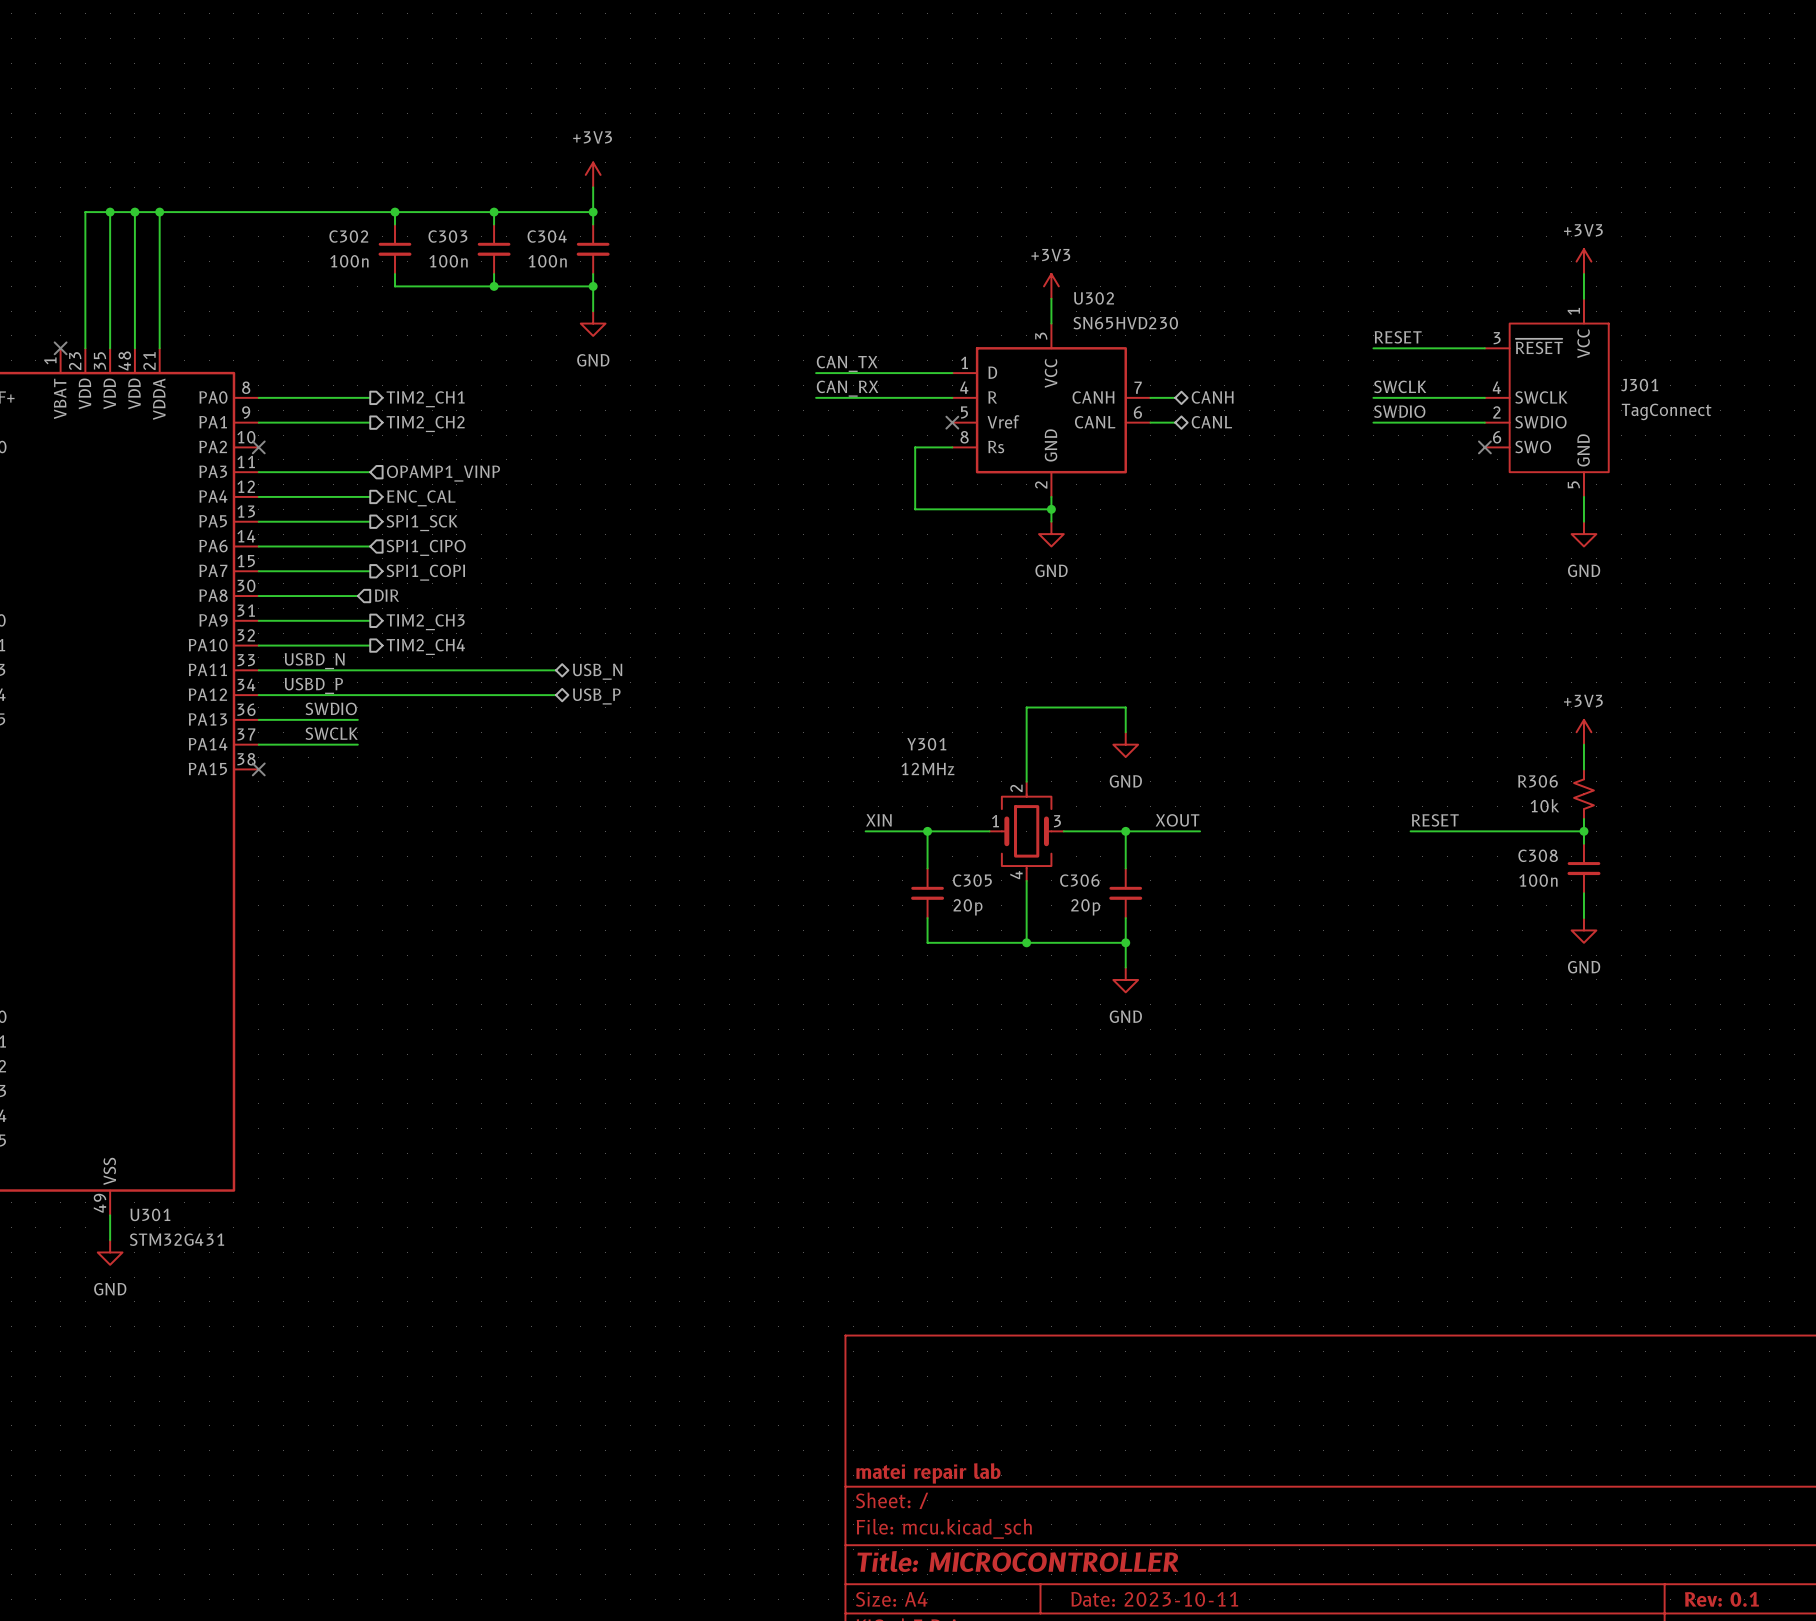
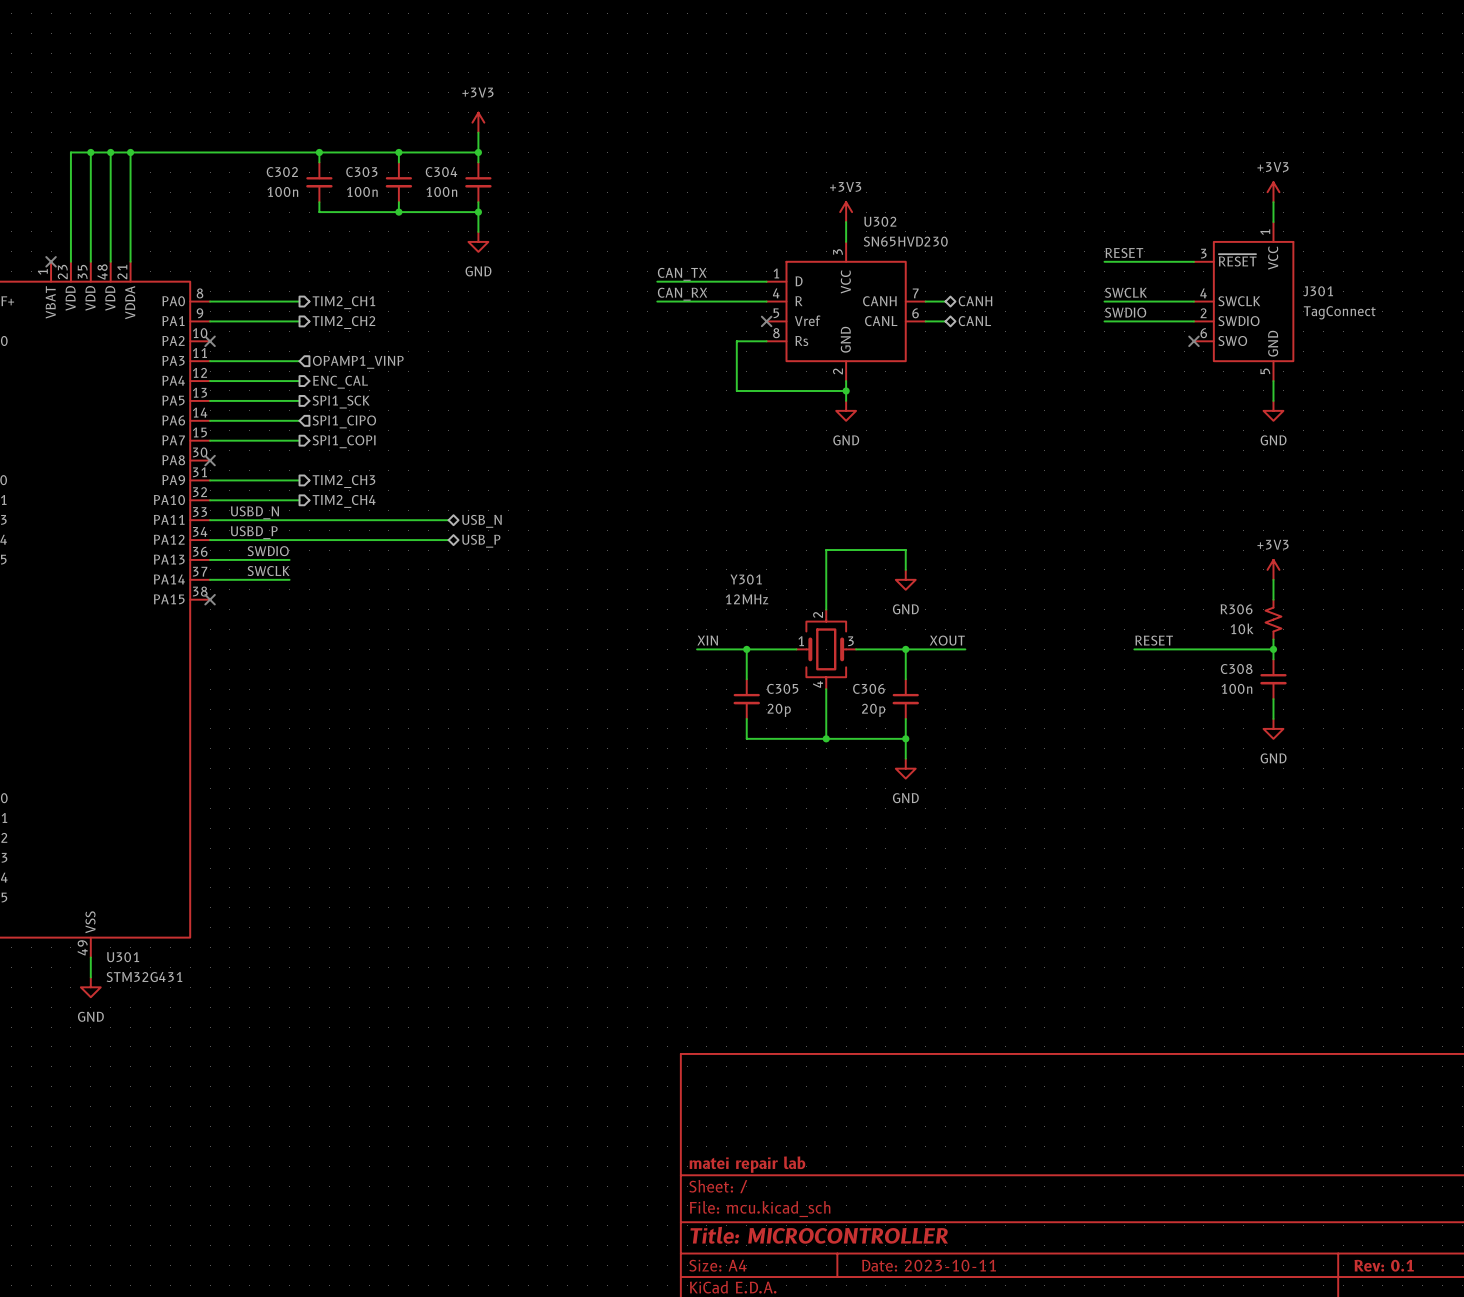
hierarchical label: DIR (387, 595) -> none
wire: (258, 596) (357, 596) -> none
no-connect mark: none -> (210, 460)

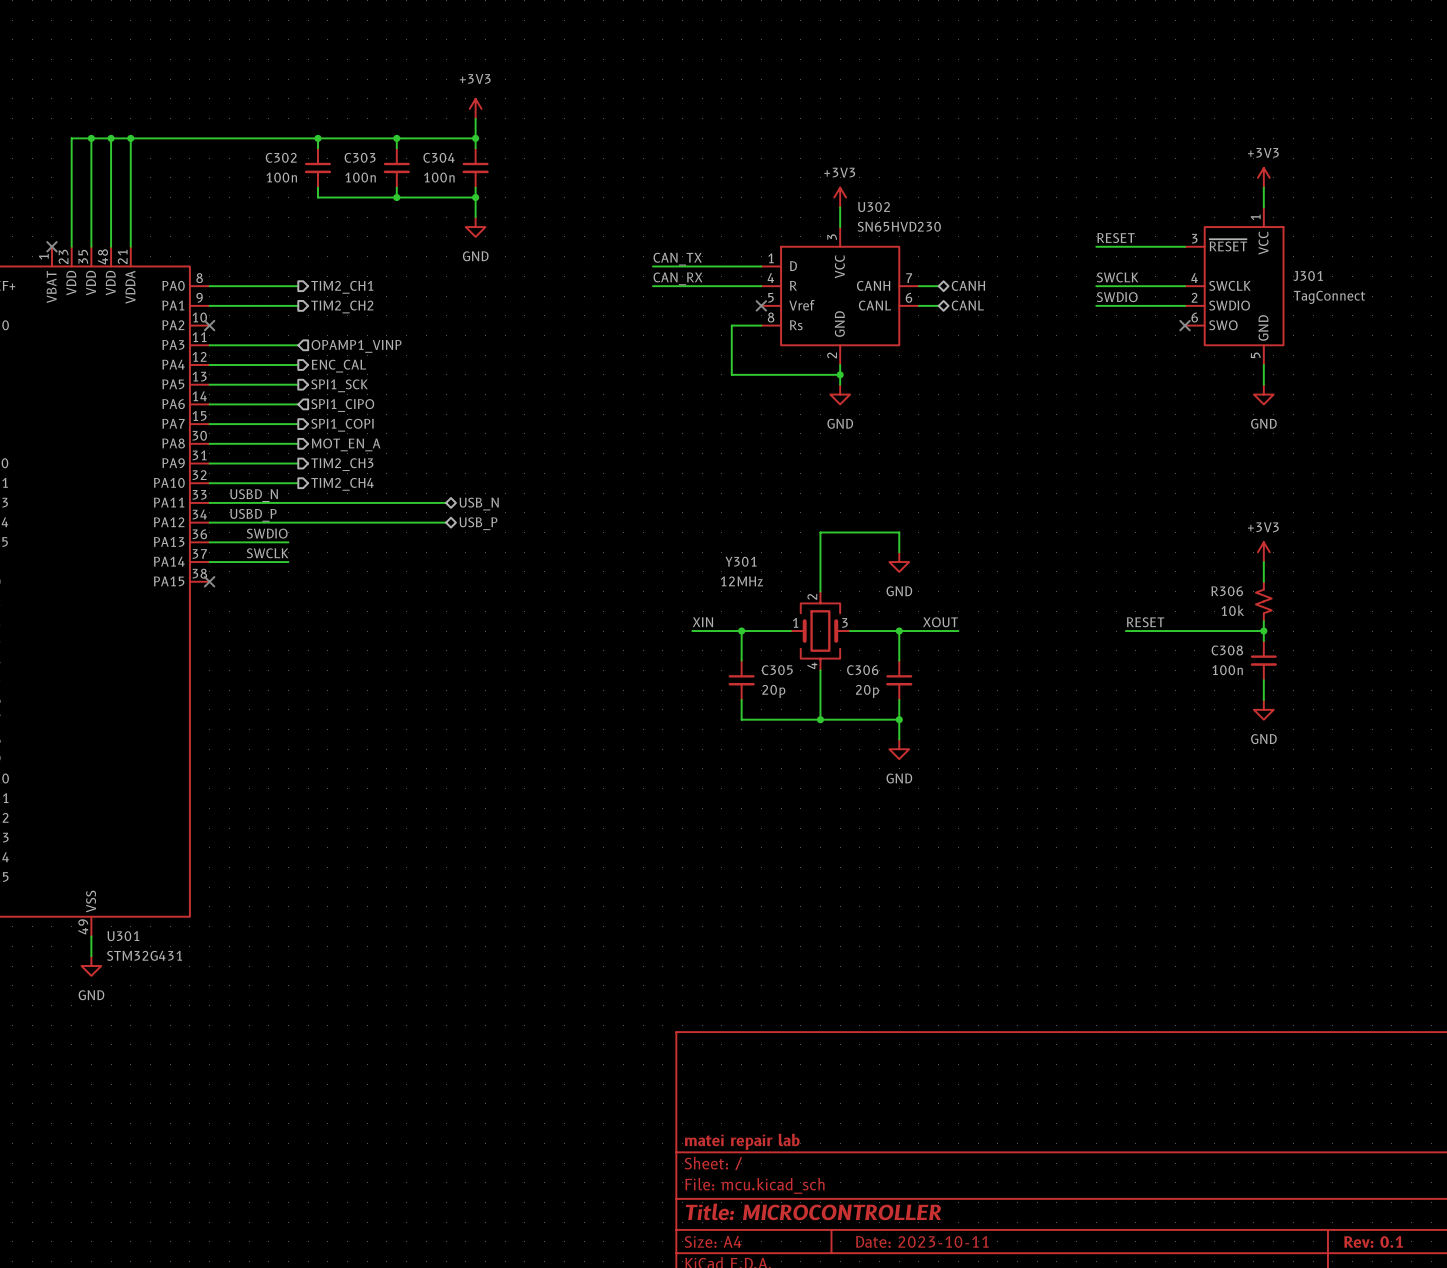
wire: none -> (209, 443) (298, 443)
no-connect mark: (210, 460) -> none
hierarchical label: none -> MOT_EN_A (346, 444)

